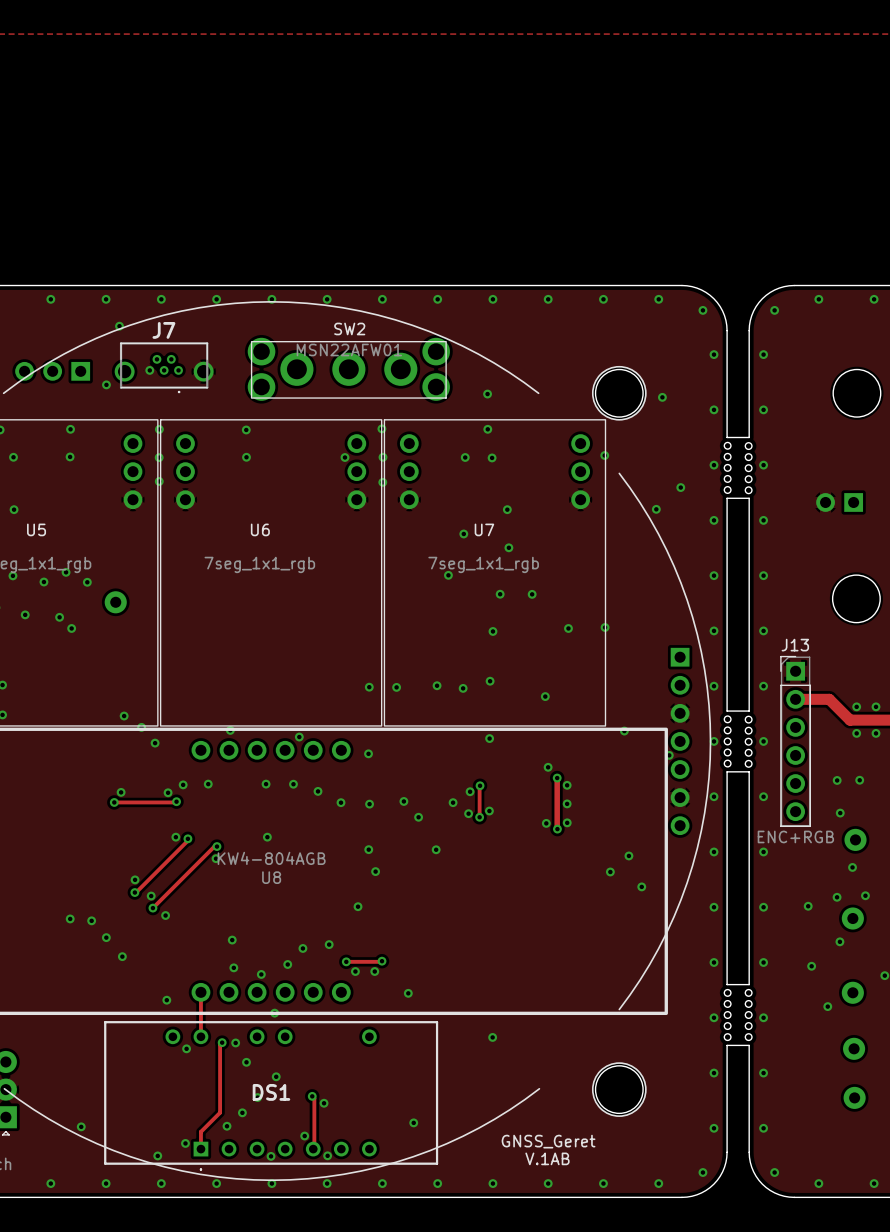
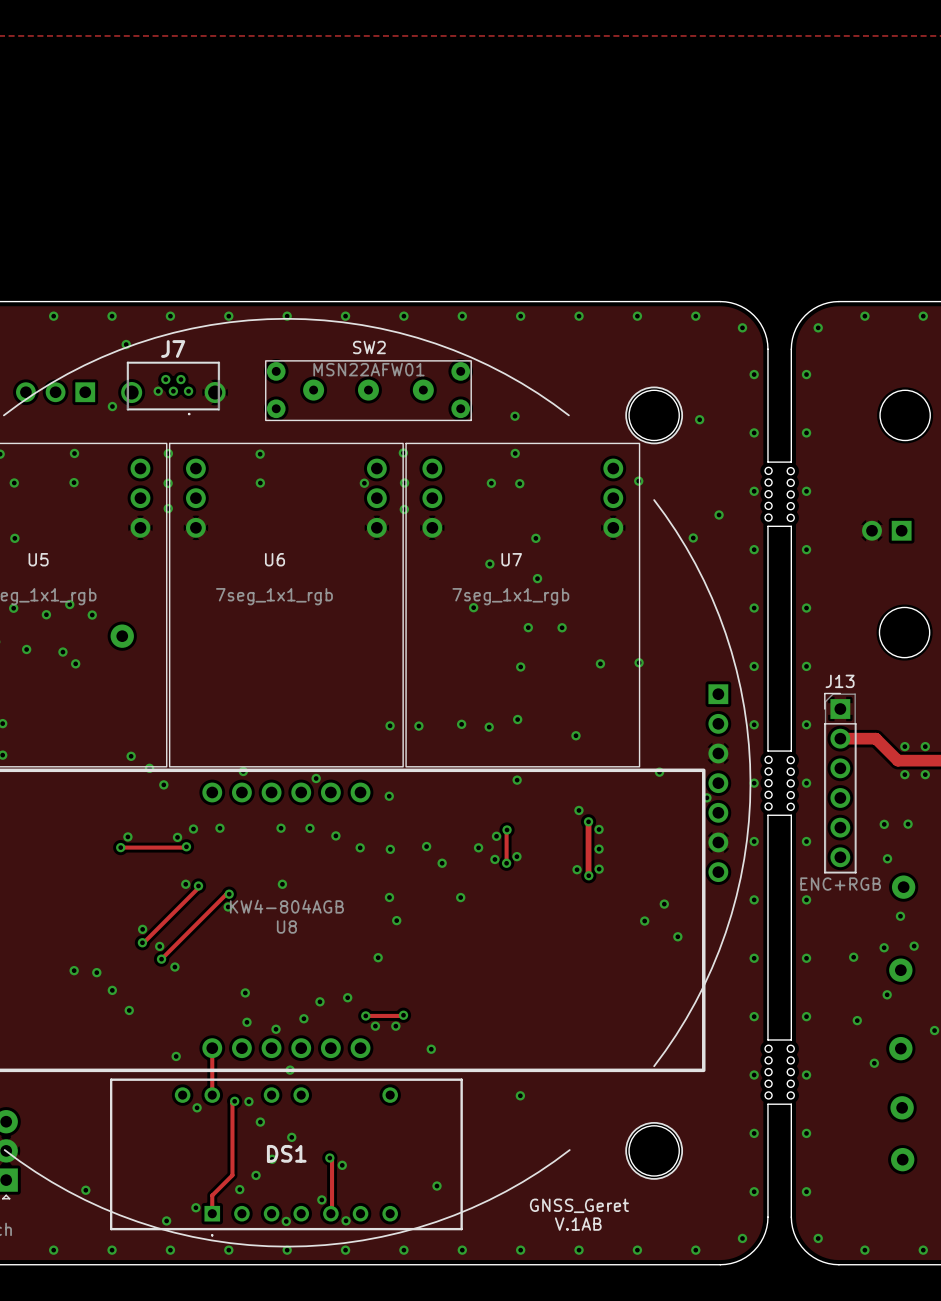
SW2 footprint: [247, 337, 450, 401] -> [265, 360, 472, 422]

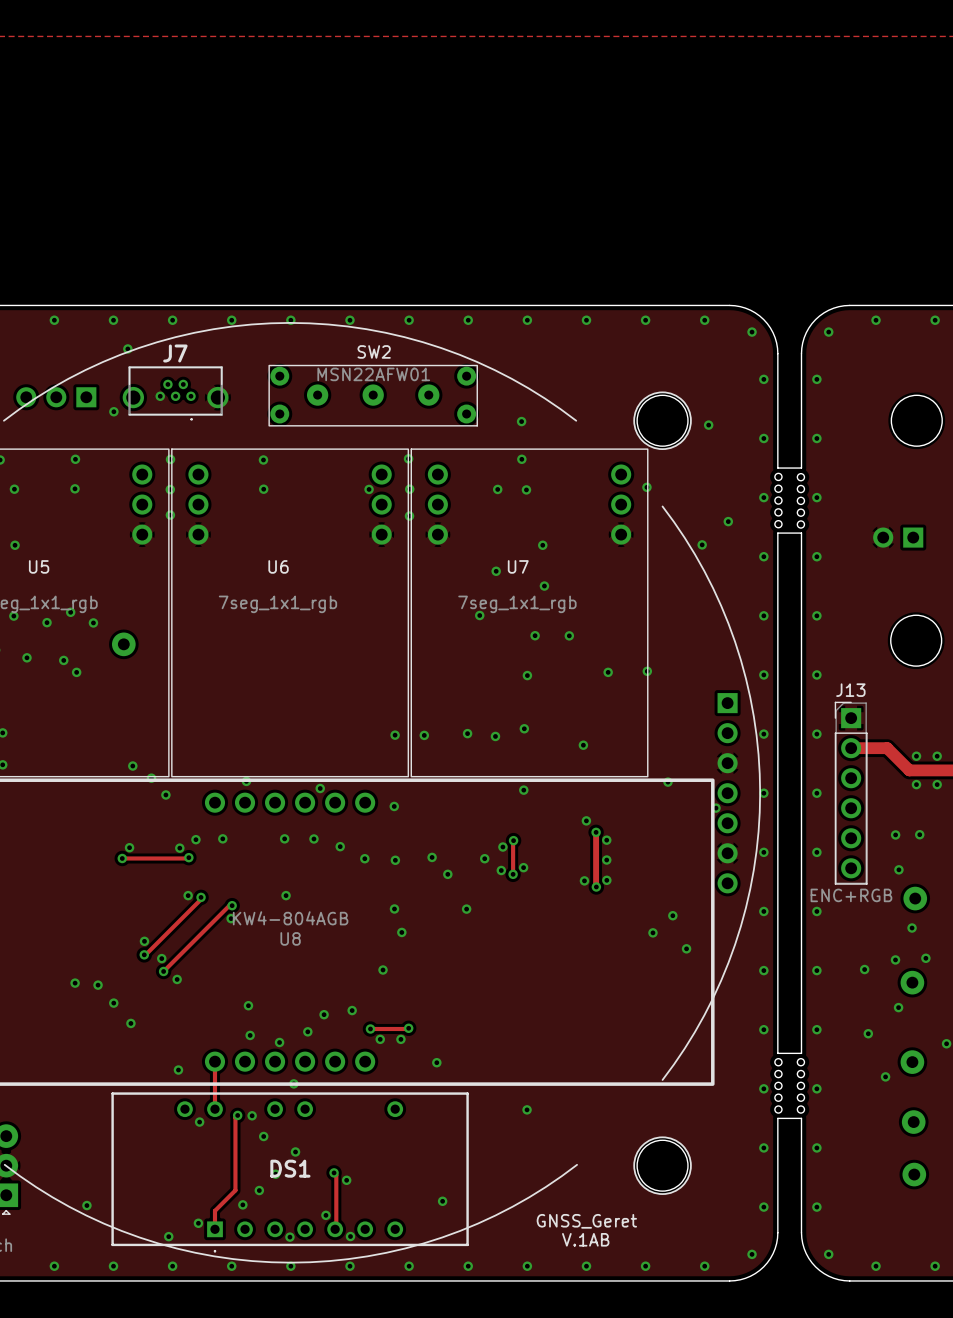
board edge: (767, 751) (791, 751) -> (777, 760) (777, 825)
round board edge: [764, 755, 773, 764] -> none
round board edge: [786, 756, 795, 765] -> none
round board edge: [764, 767, 773, 776] -> none
round board edge: [786, 767, 795, 776] -> none
round board edge: [764, 779, 773, 788] -> none
round board edge: [786, 779, 795, 788] -> none
round board edge: [764, 790, 773, 799] -> none
round board edge: [786, 791, 795, 800] -> none
round board edge: [764, 802, 773, 811] -> none
round board edge: [786, 802, 795, 811] -> none
board edge: (767, 815) (791, 815) -> (801, 760) (801, 825)

